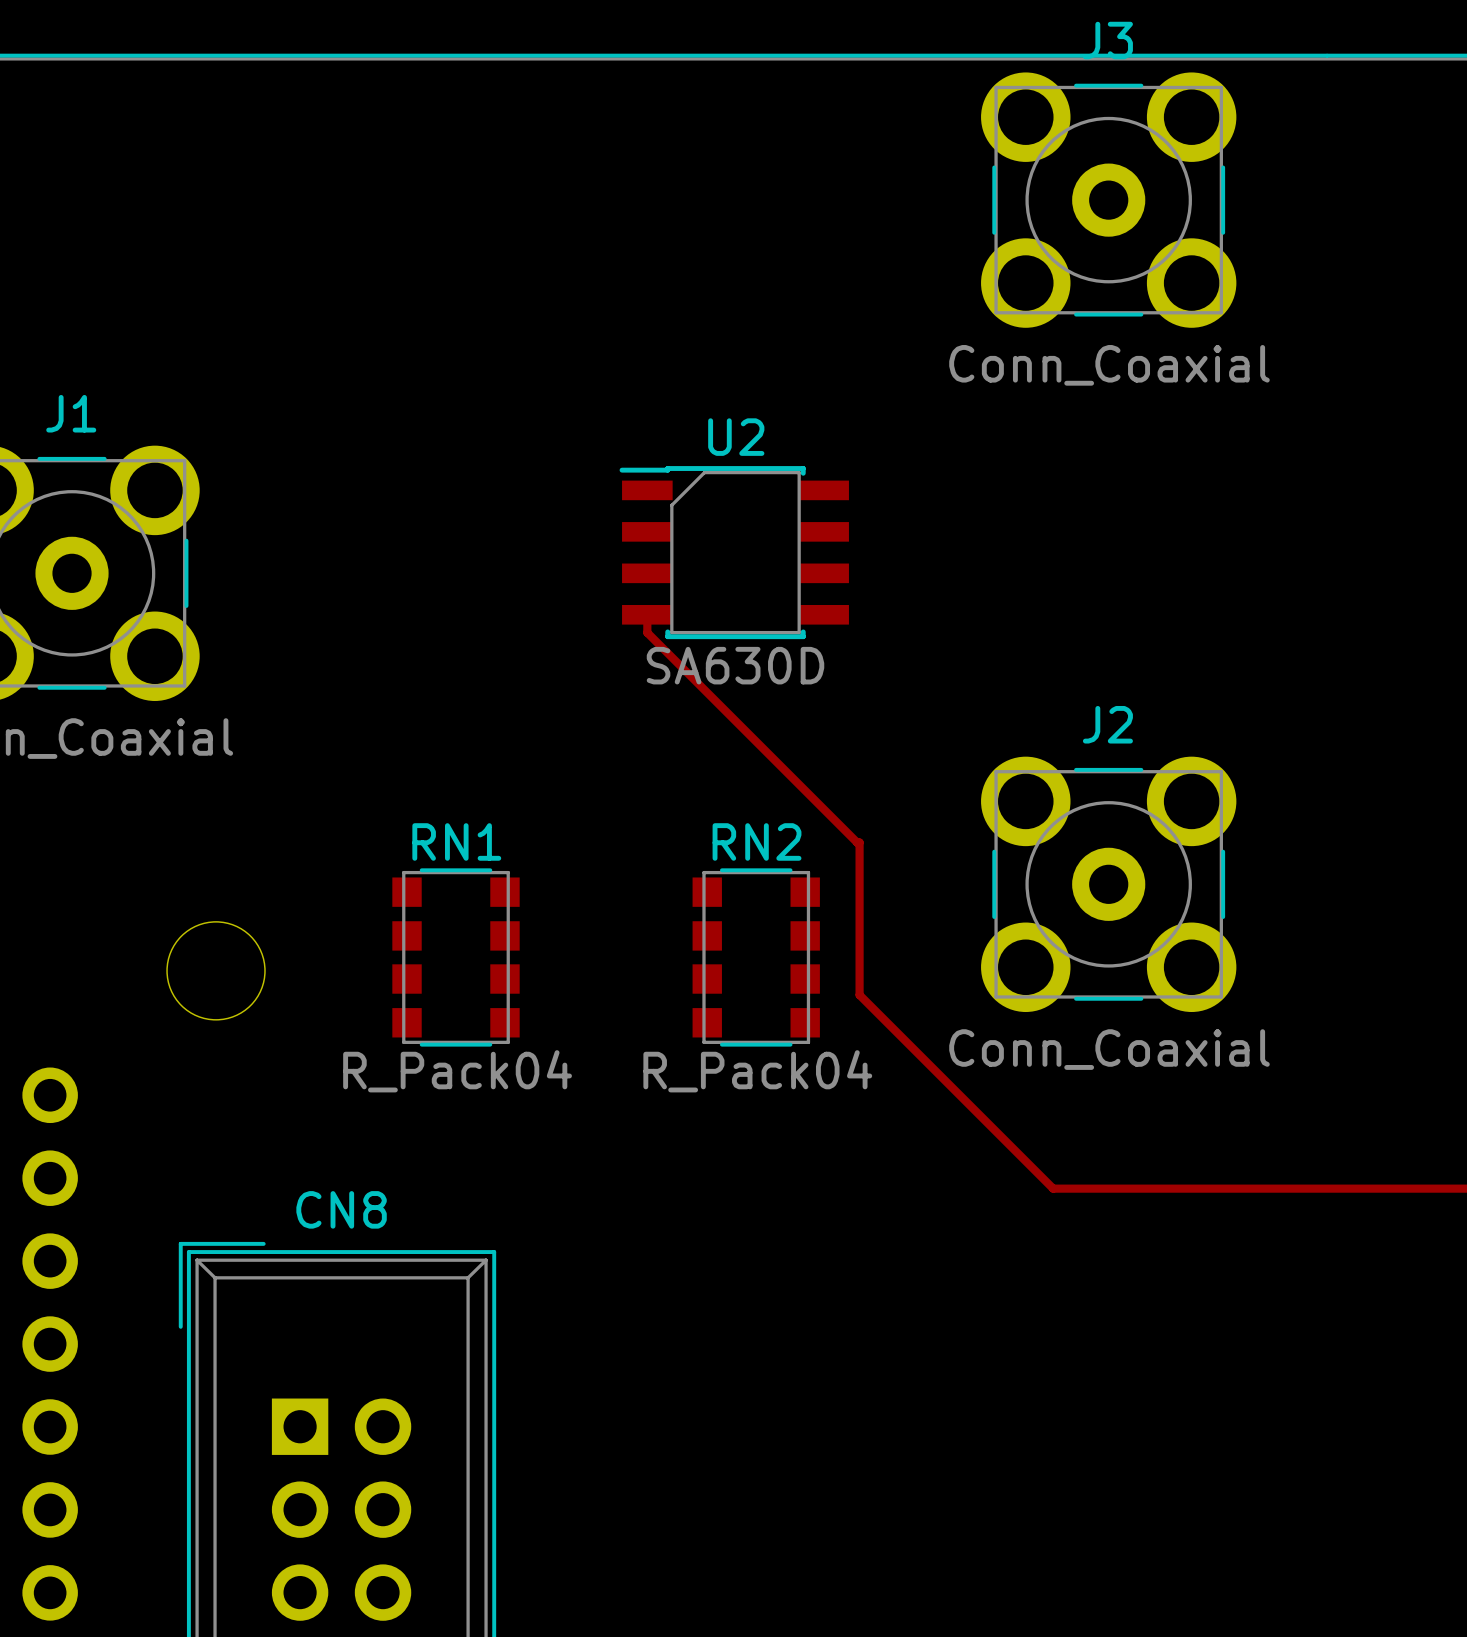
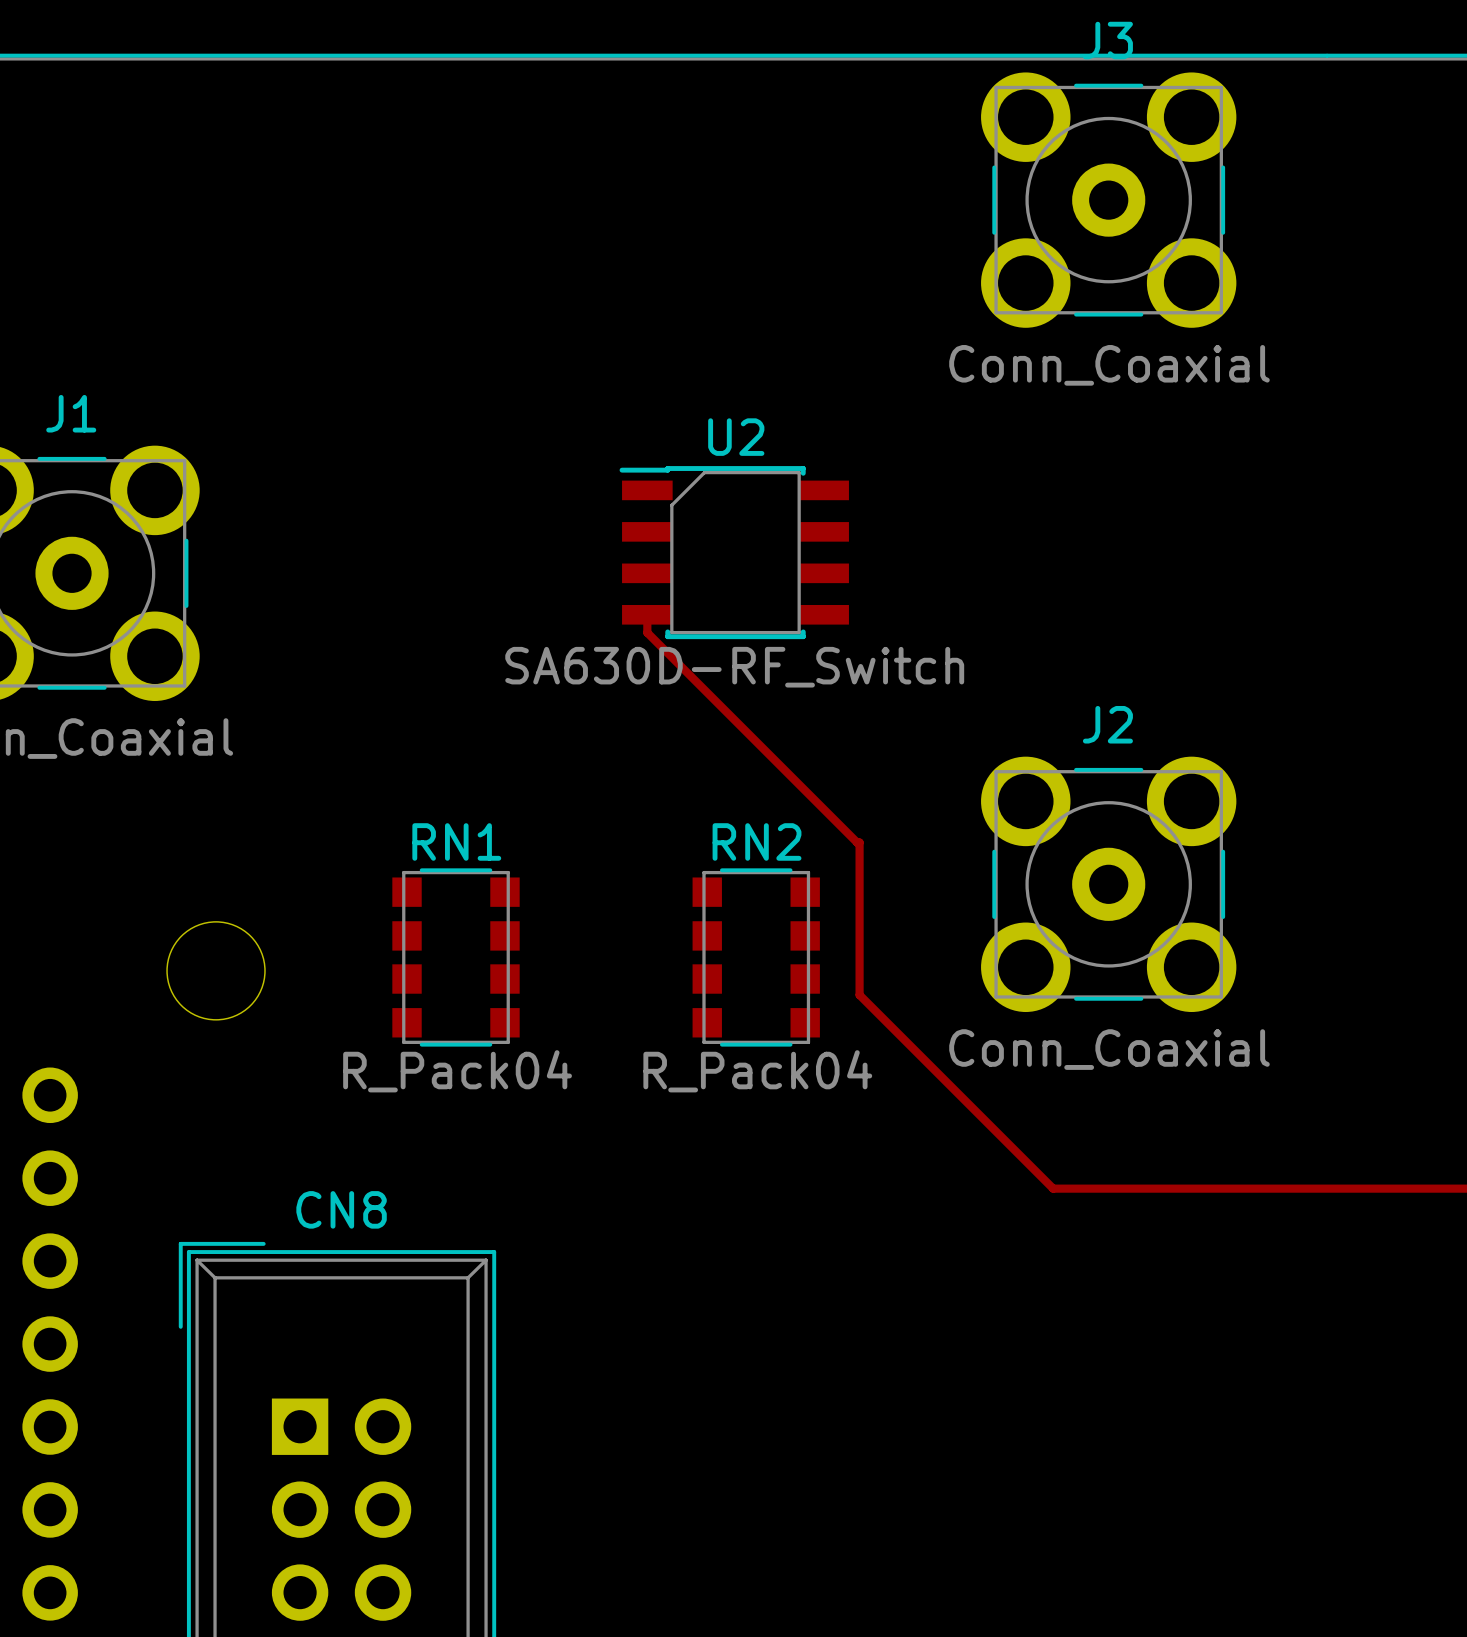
U2 value: SA630D (735, 665) -> SA630D-RF_Switch (734, 667)

